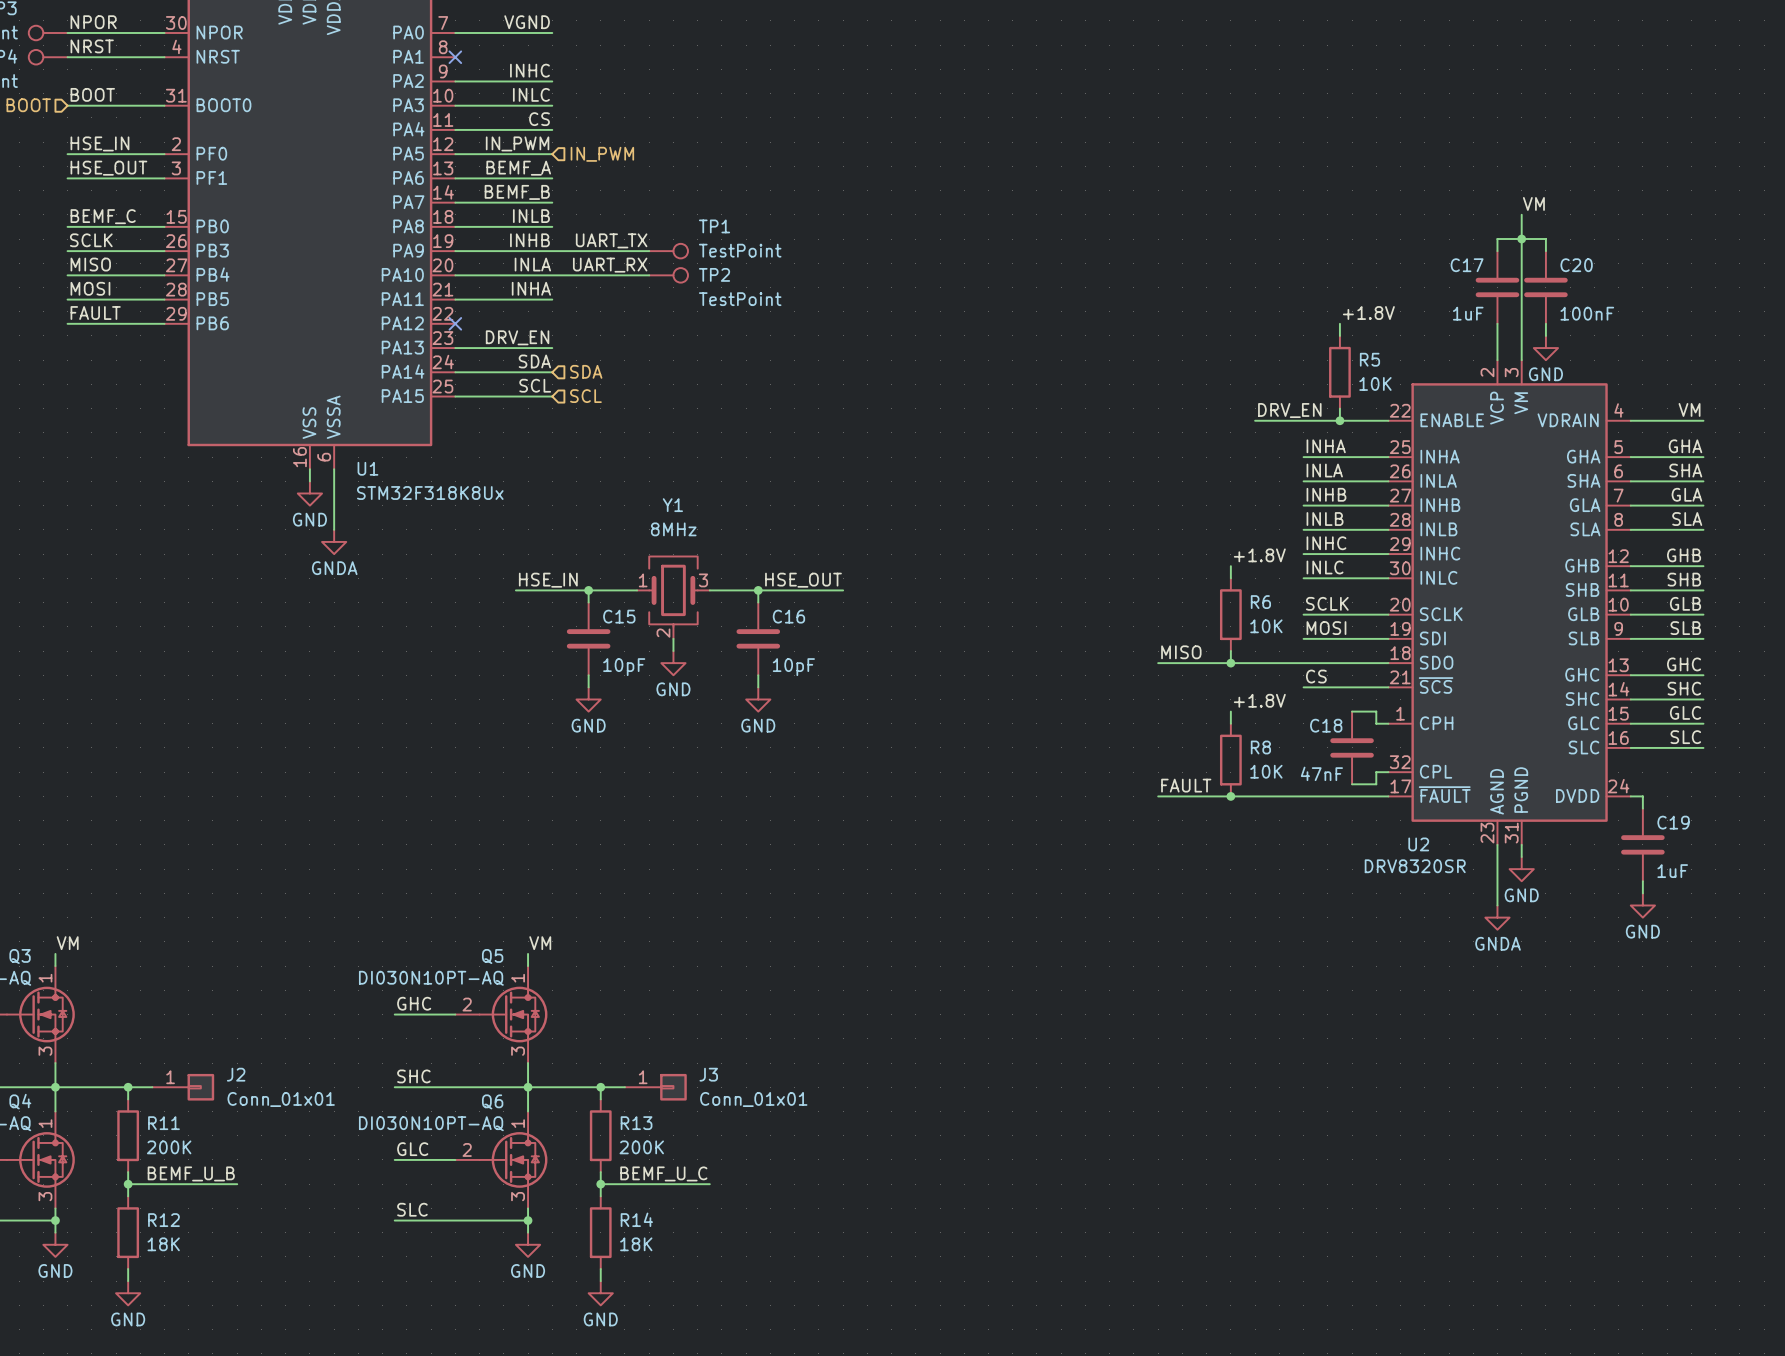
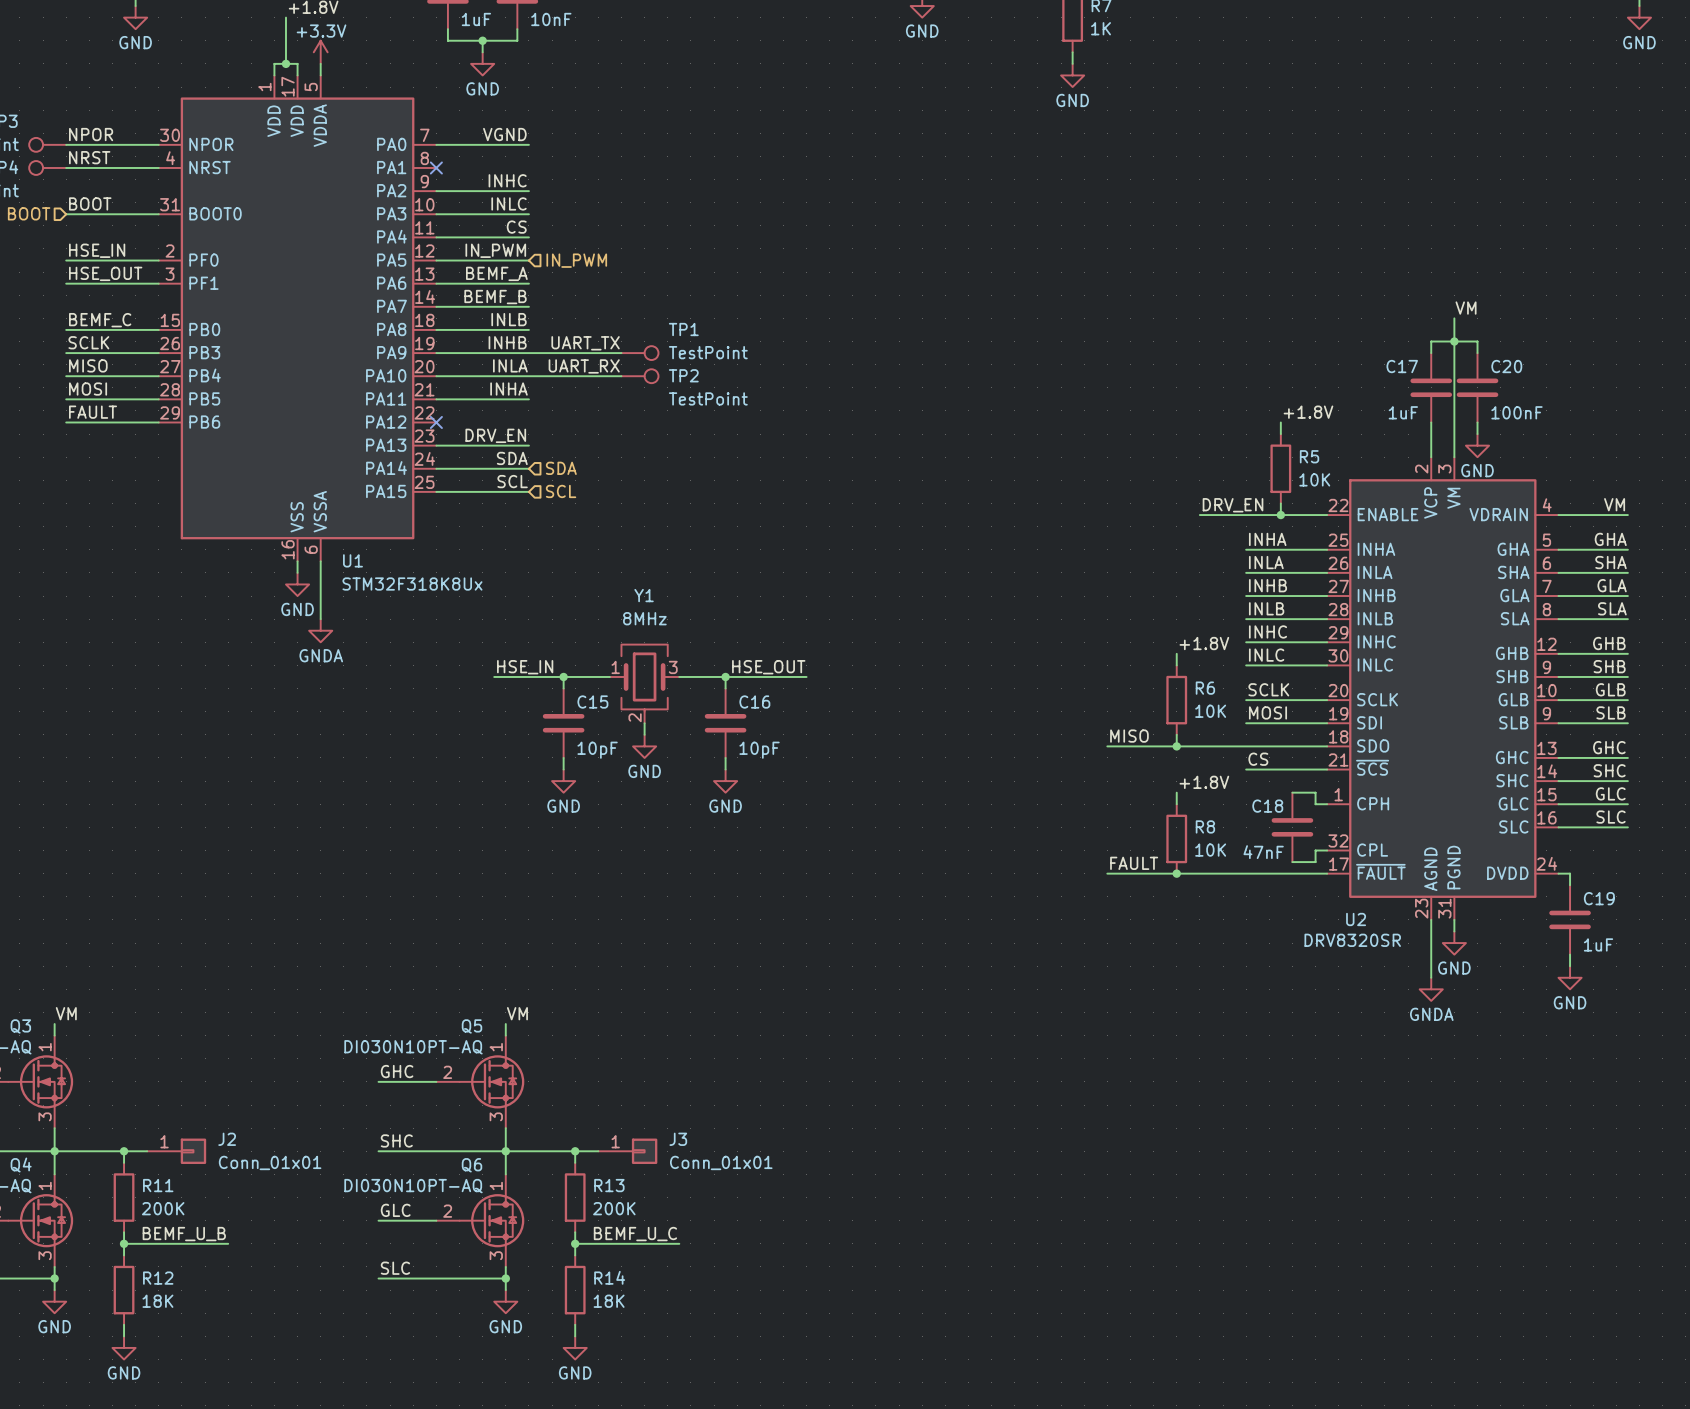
U2 pin number: 11 (1618, 580) -> 9 (1546, 667)

